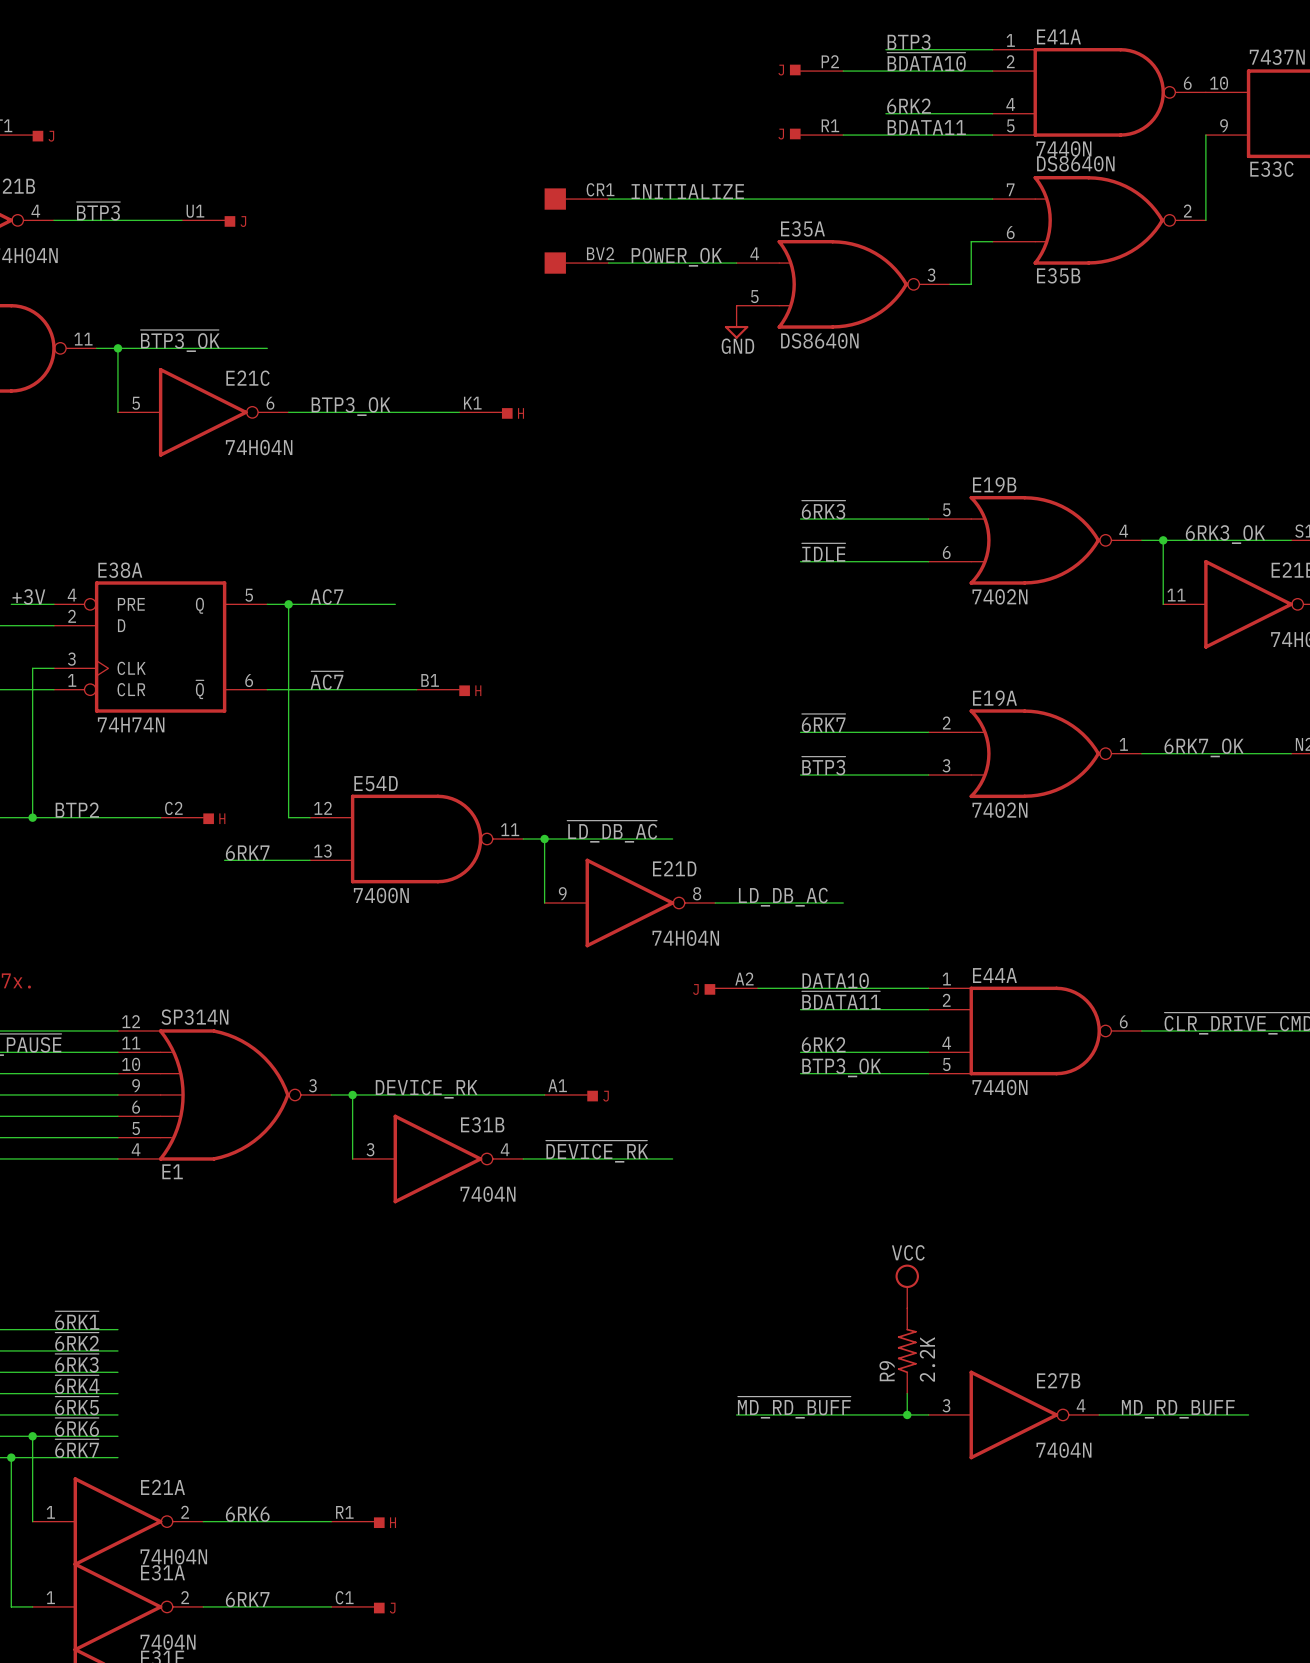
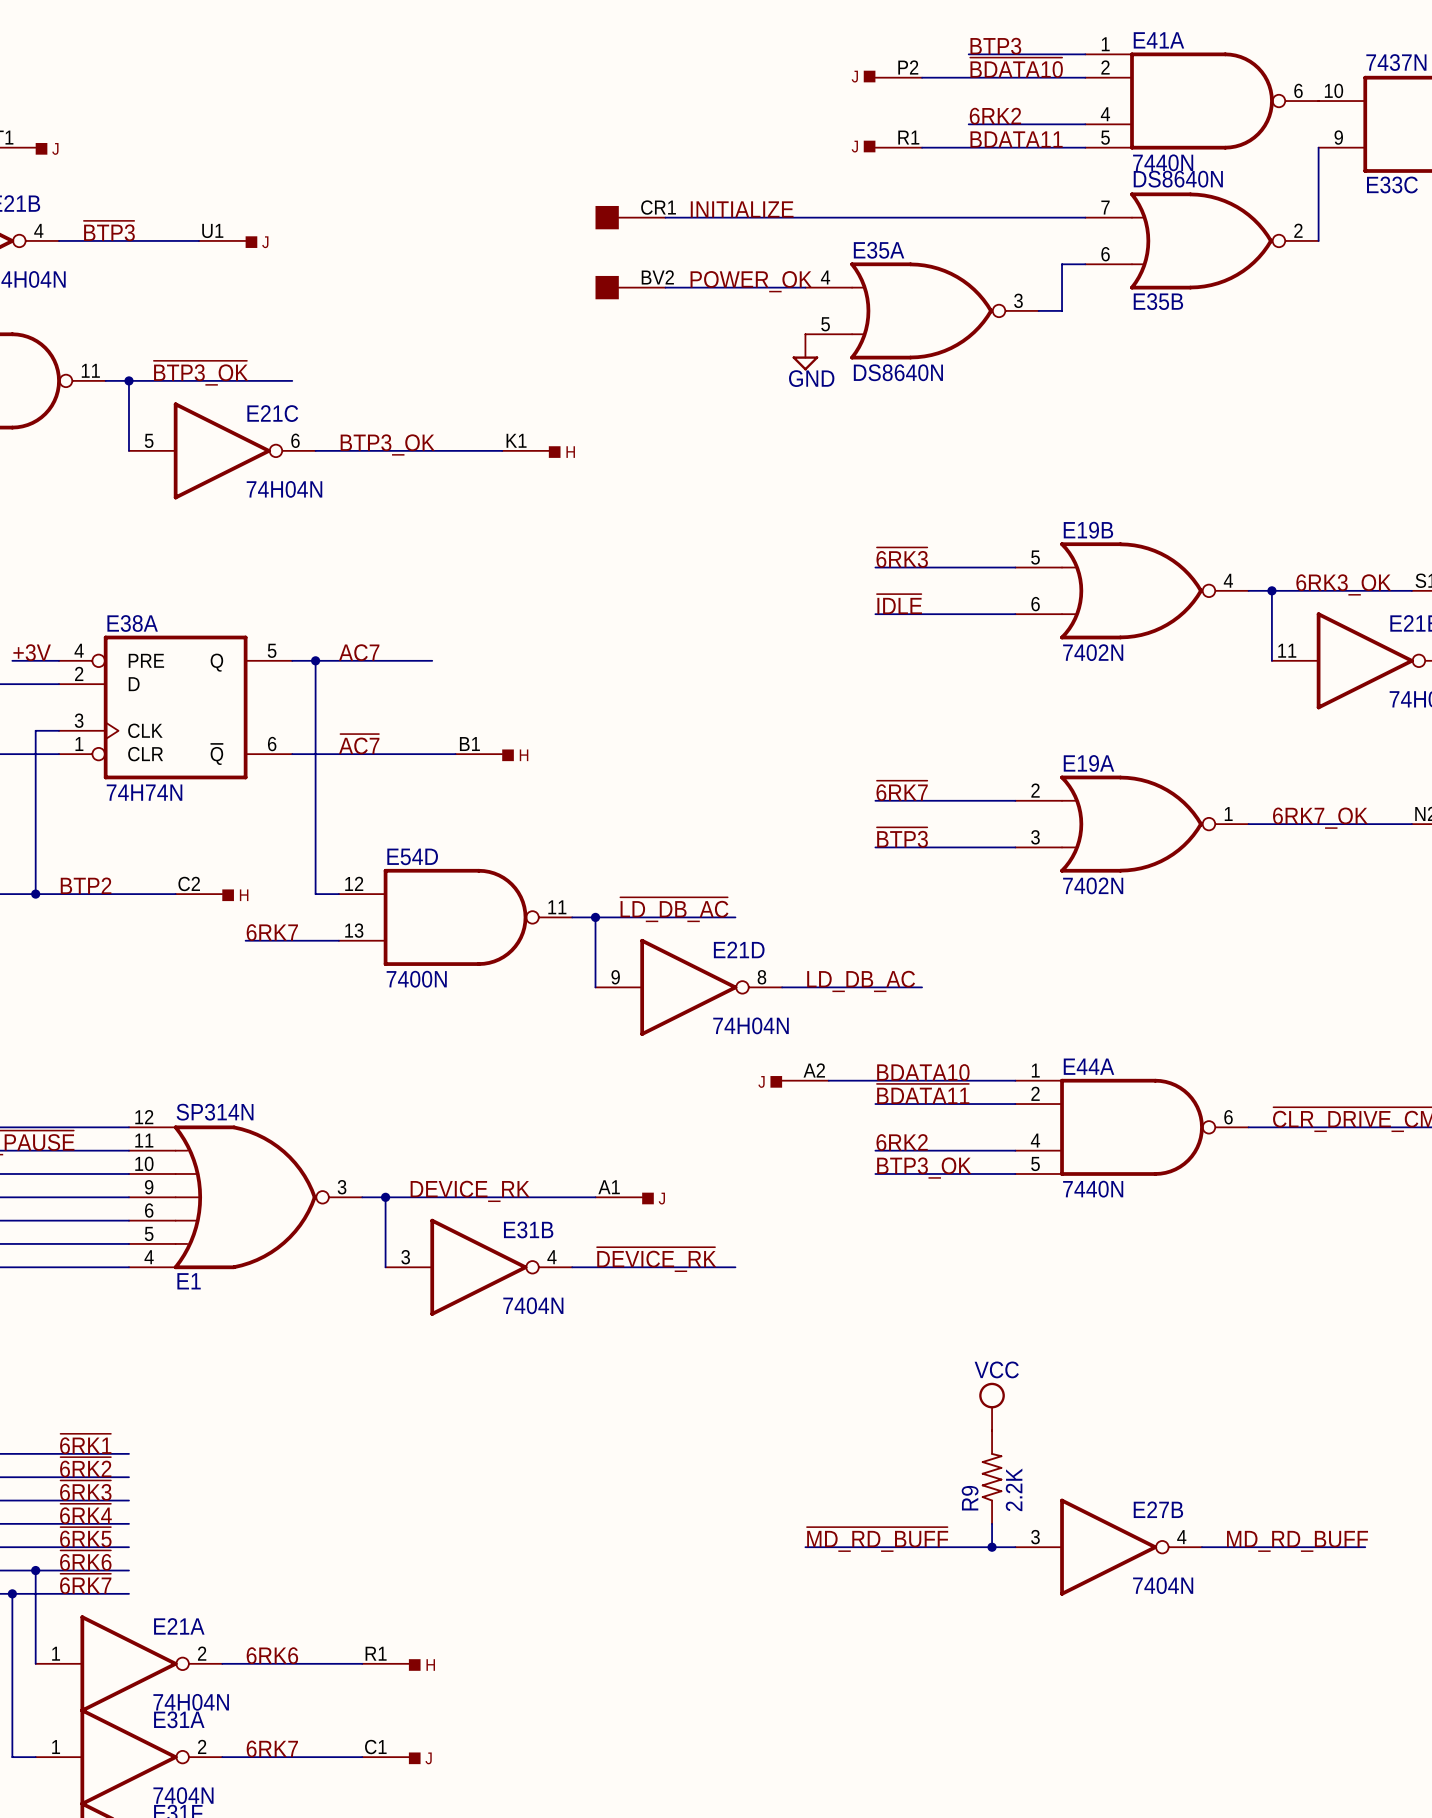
label: DATA10 (835, 980) -> BDATA10 (923, 1072)

